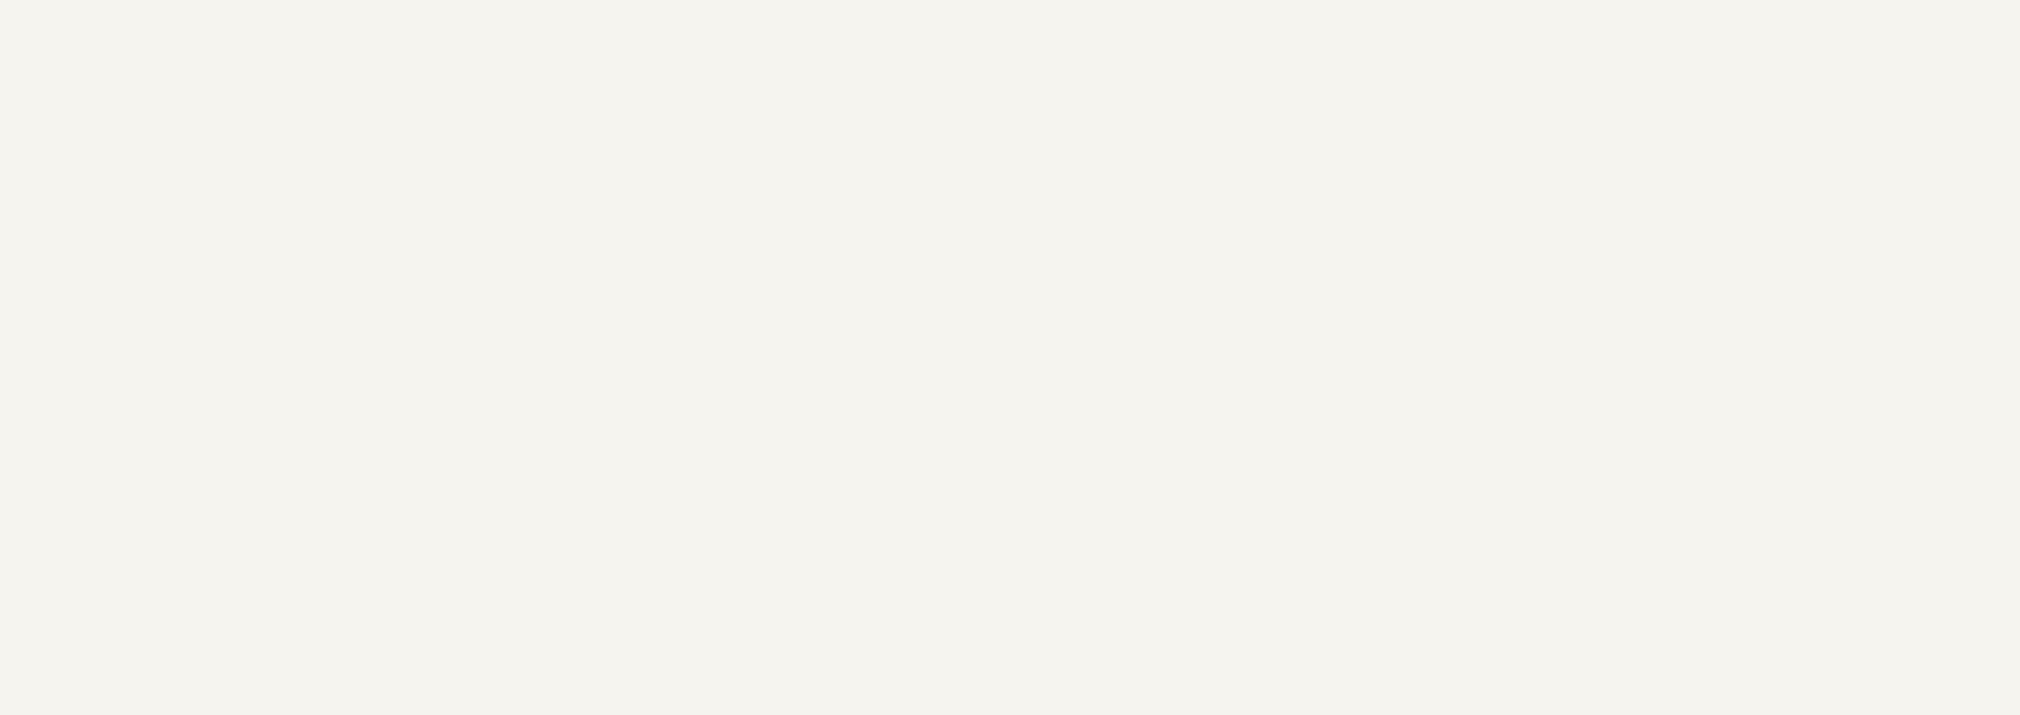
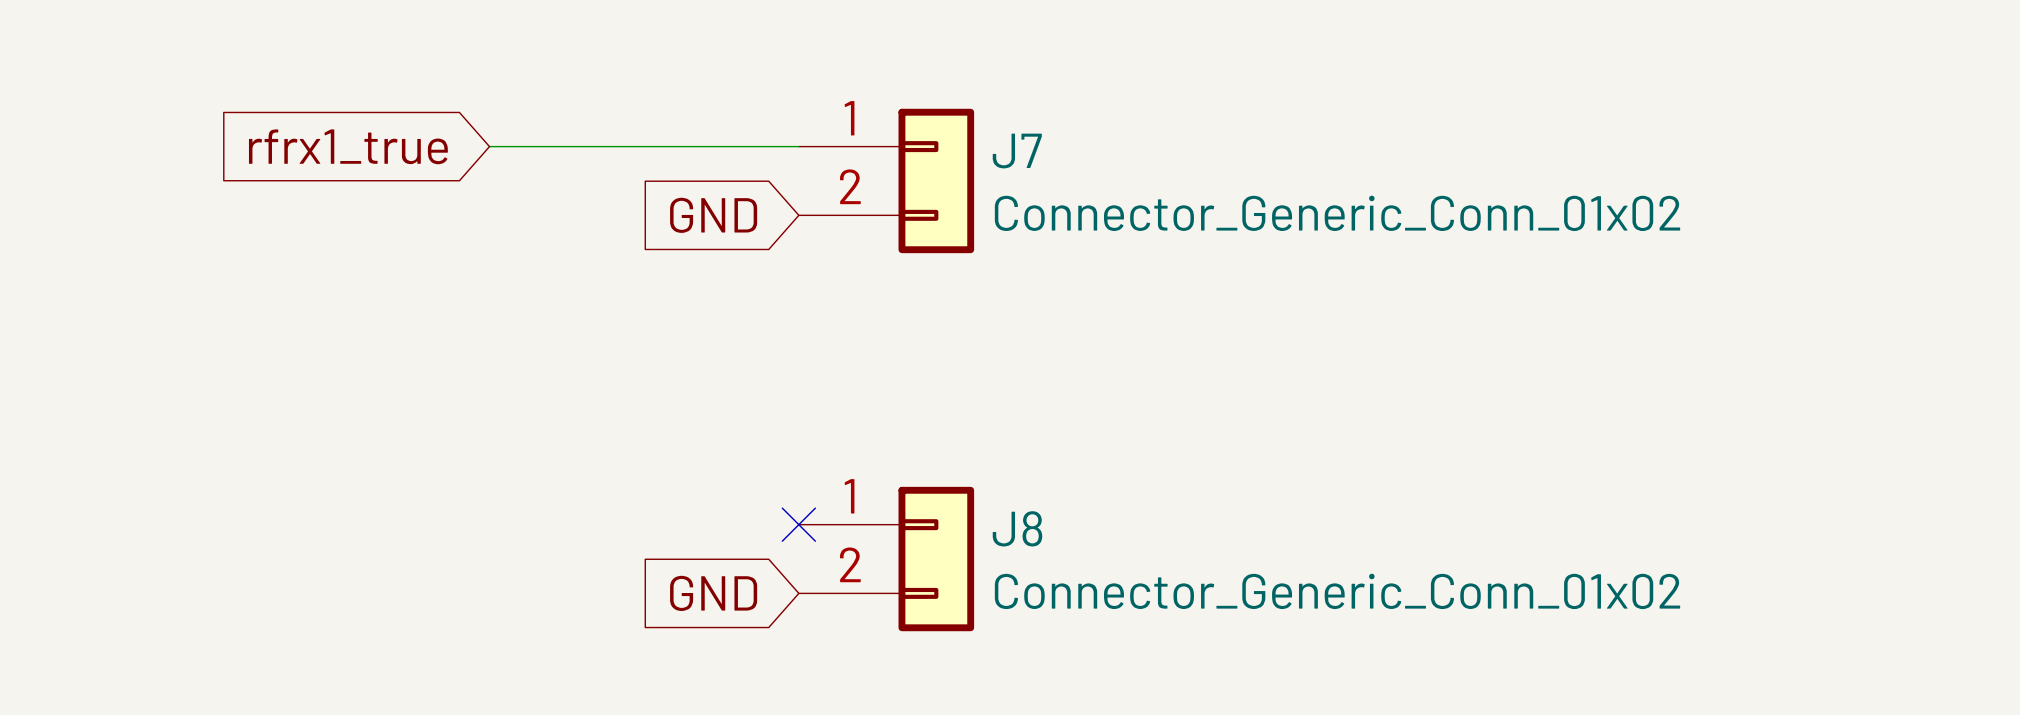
global label: none -> rfrx1_true (348, 146)
wire: none -> (489, 146) (798, 146)
J7: none -> Connector_Generic_Conn_01x02 (886, 180)
global label: none -> GND (713, 215)
no-connect mark: none -> (798, 524)
J8: none -> Connector_Generic_Conn_01x02 (886, 559)
global label: none -> GND (713, 593)

